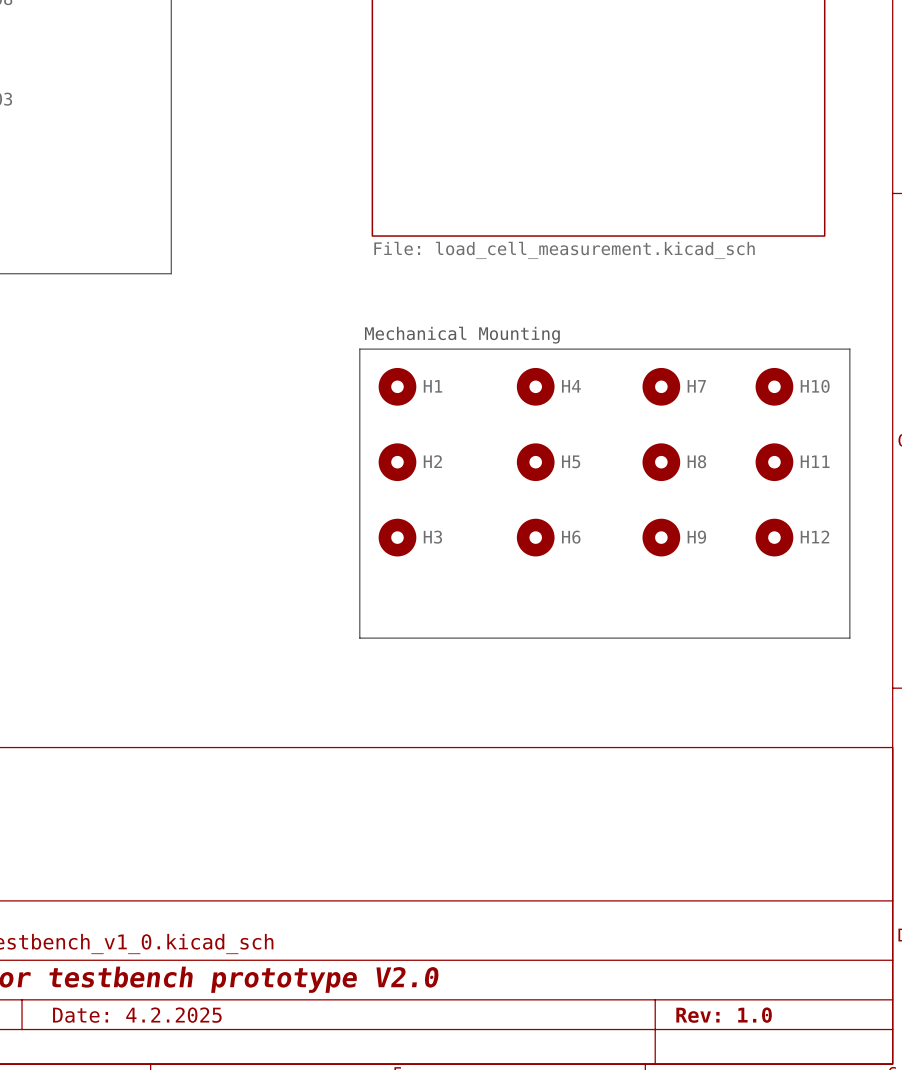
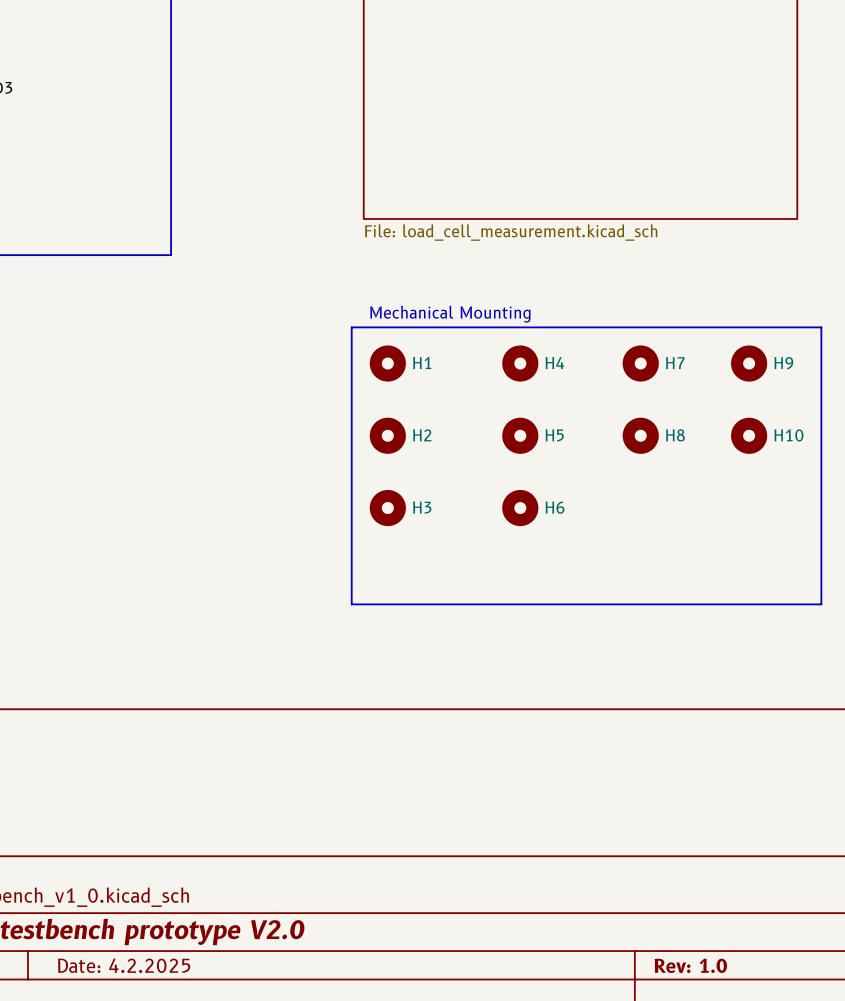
H10 name: H10 (815, 386) -> H9 (783, 363)
H11 name: H11 (815, 461) -> H10 (788, 435)
H9: (661, 537) -> none
H12: (774, 537) -> none

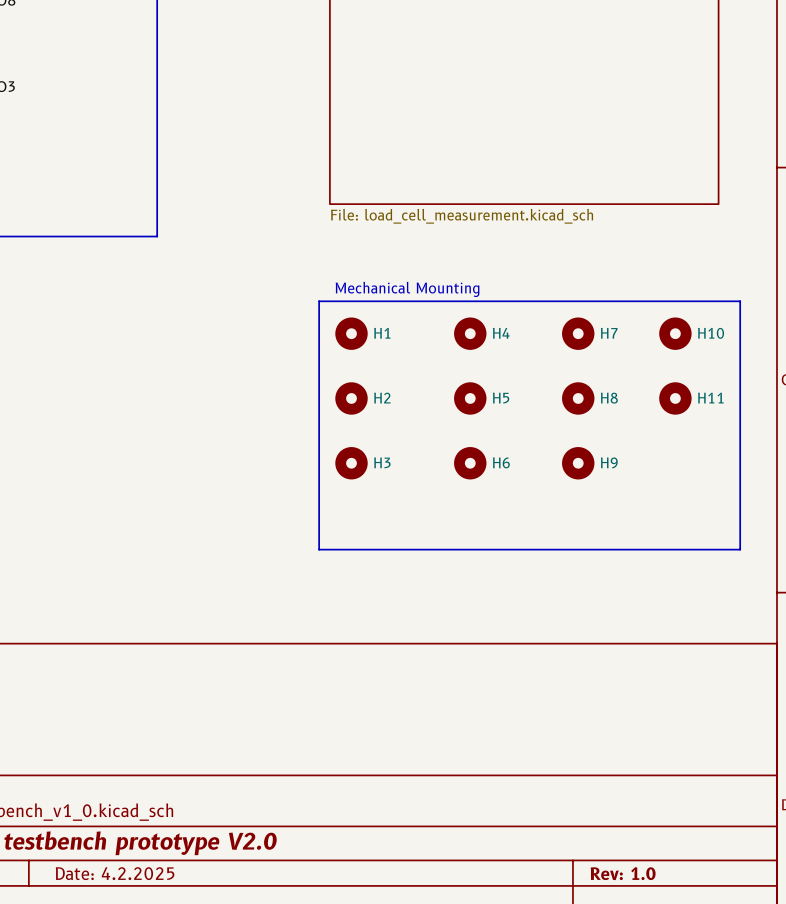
H9 name: H9 (783, 363) -> H10 (711, 333)
H10 name: H10 (788, 435) -> H11 (710, 398)
H9: none -> (578, 463)

